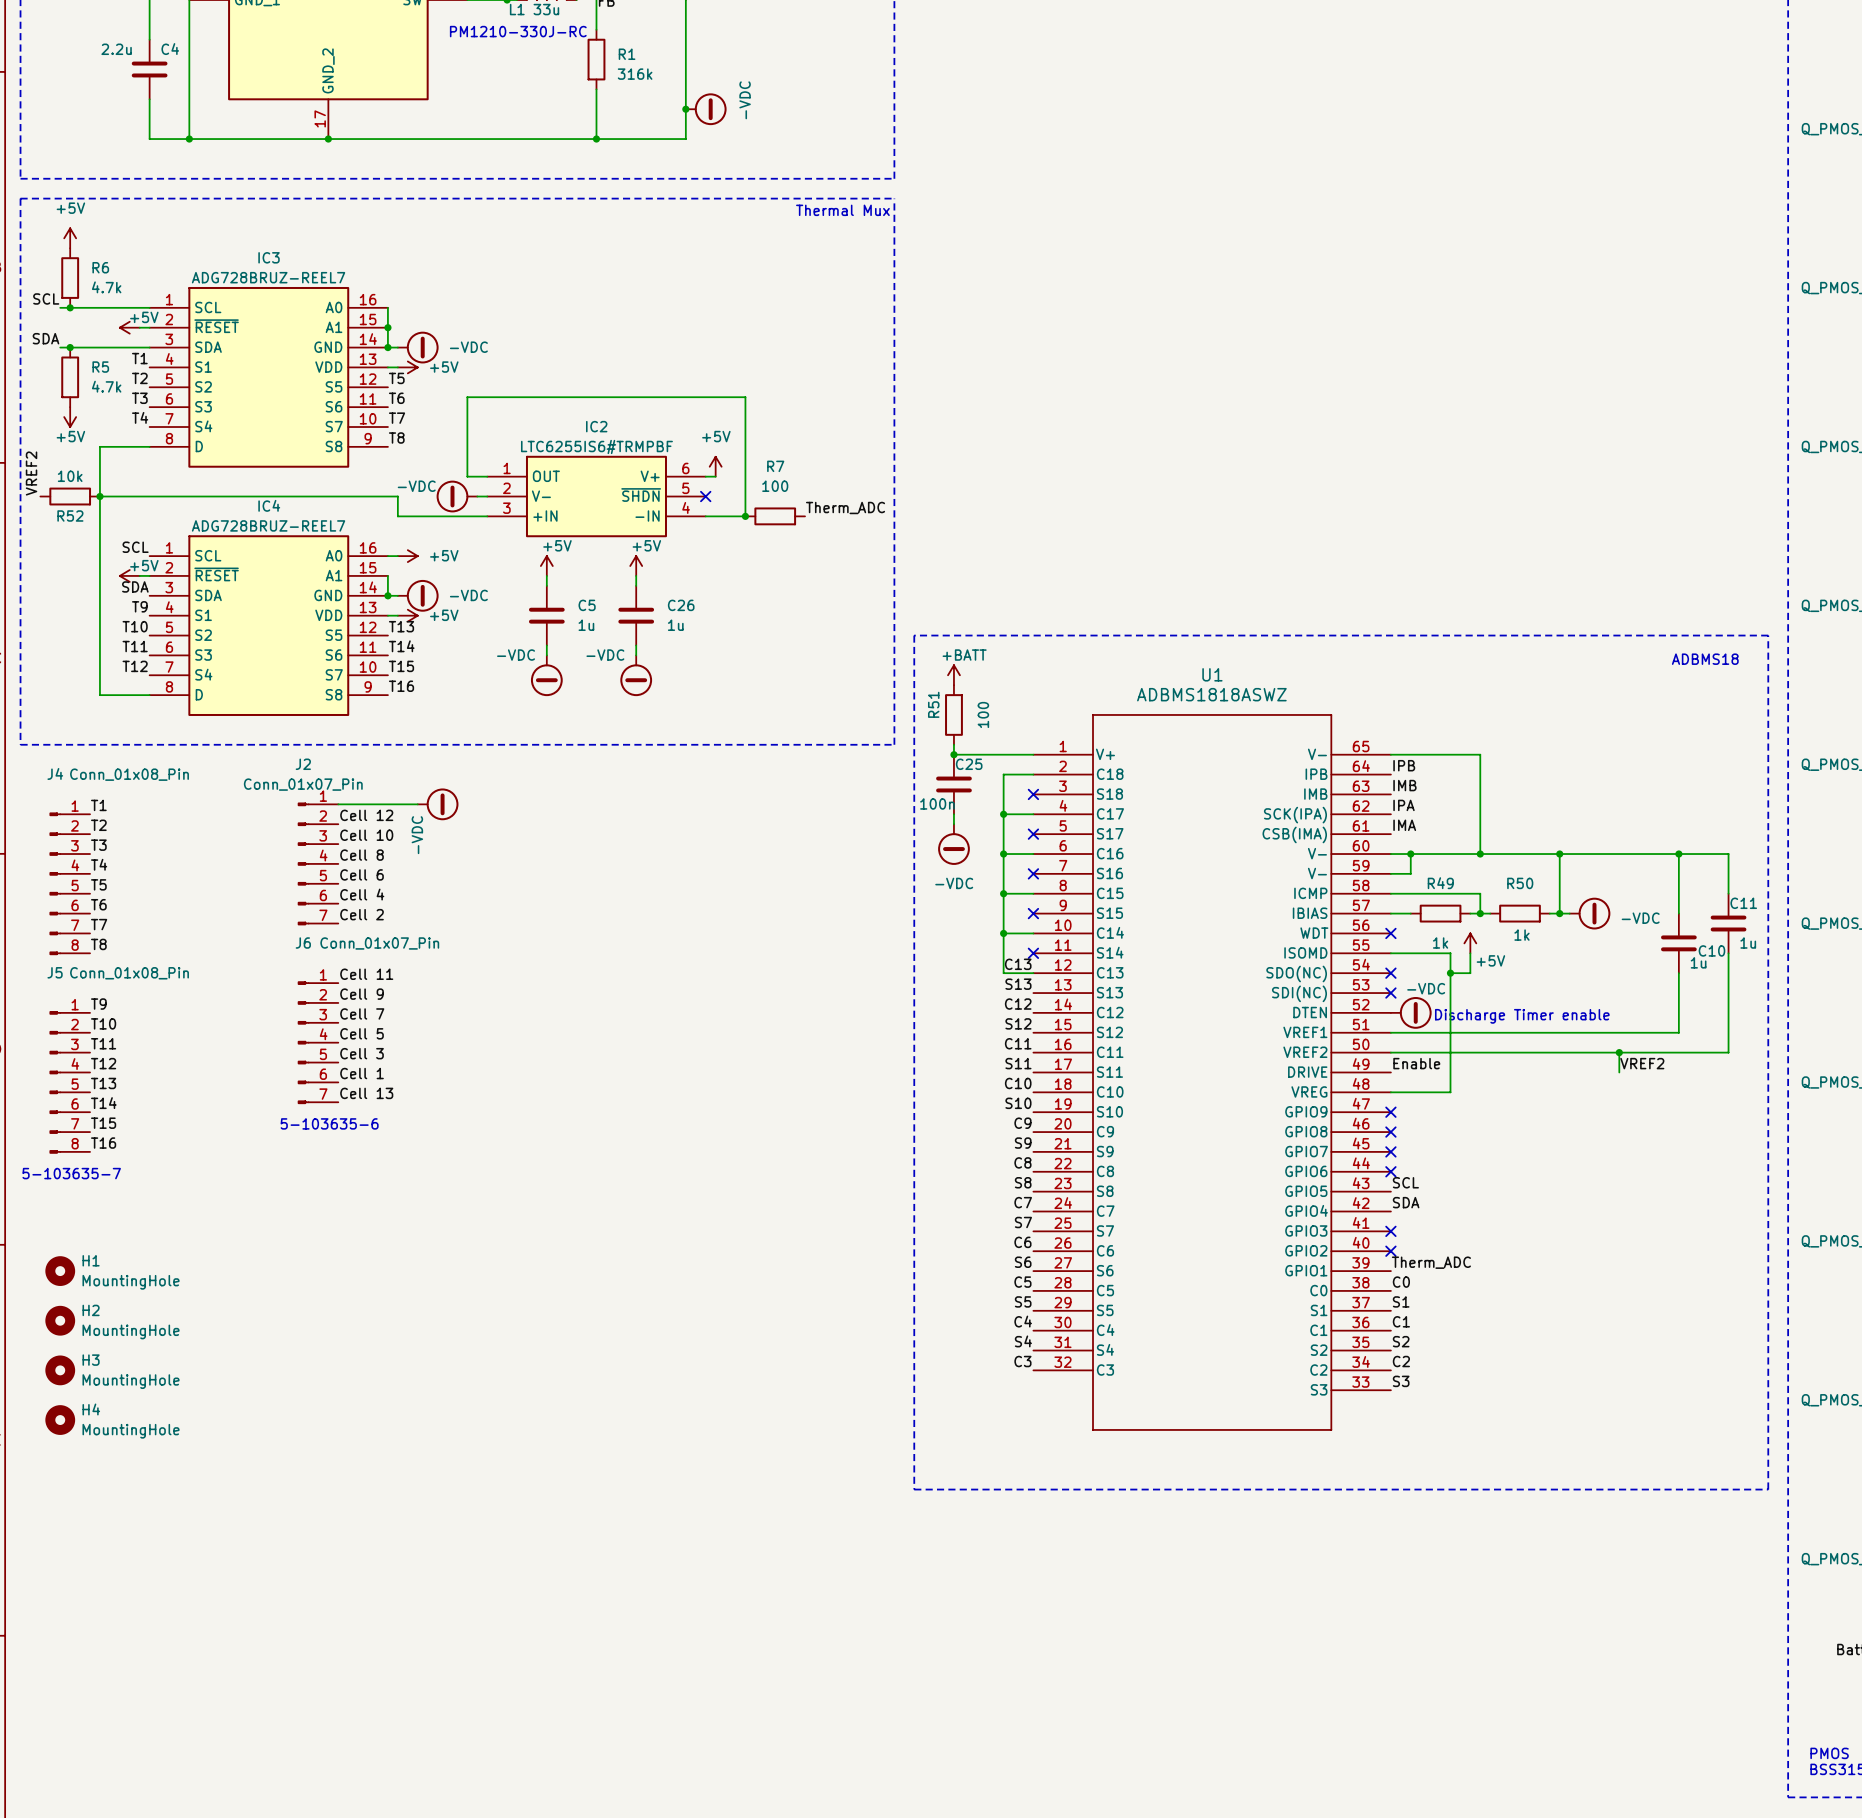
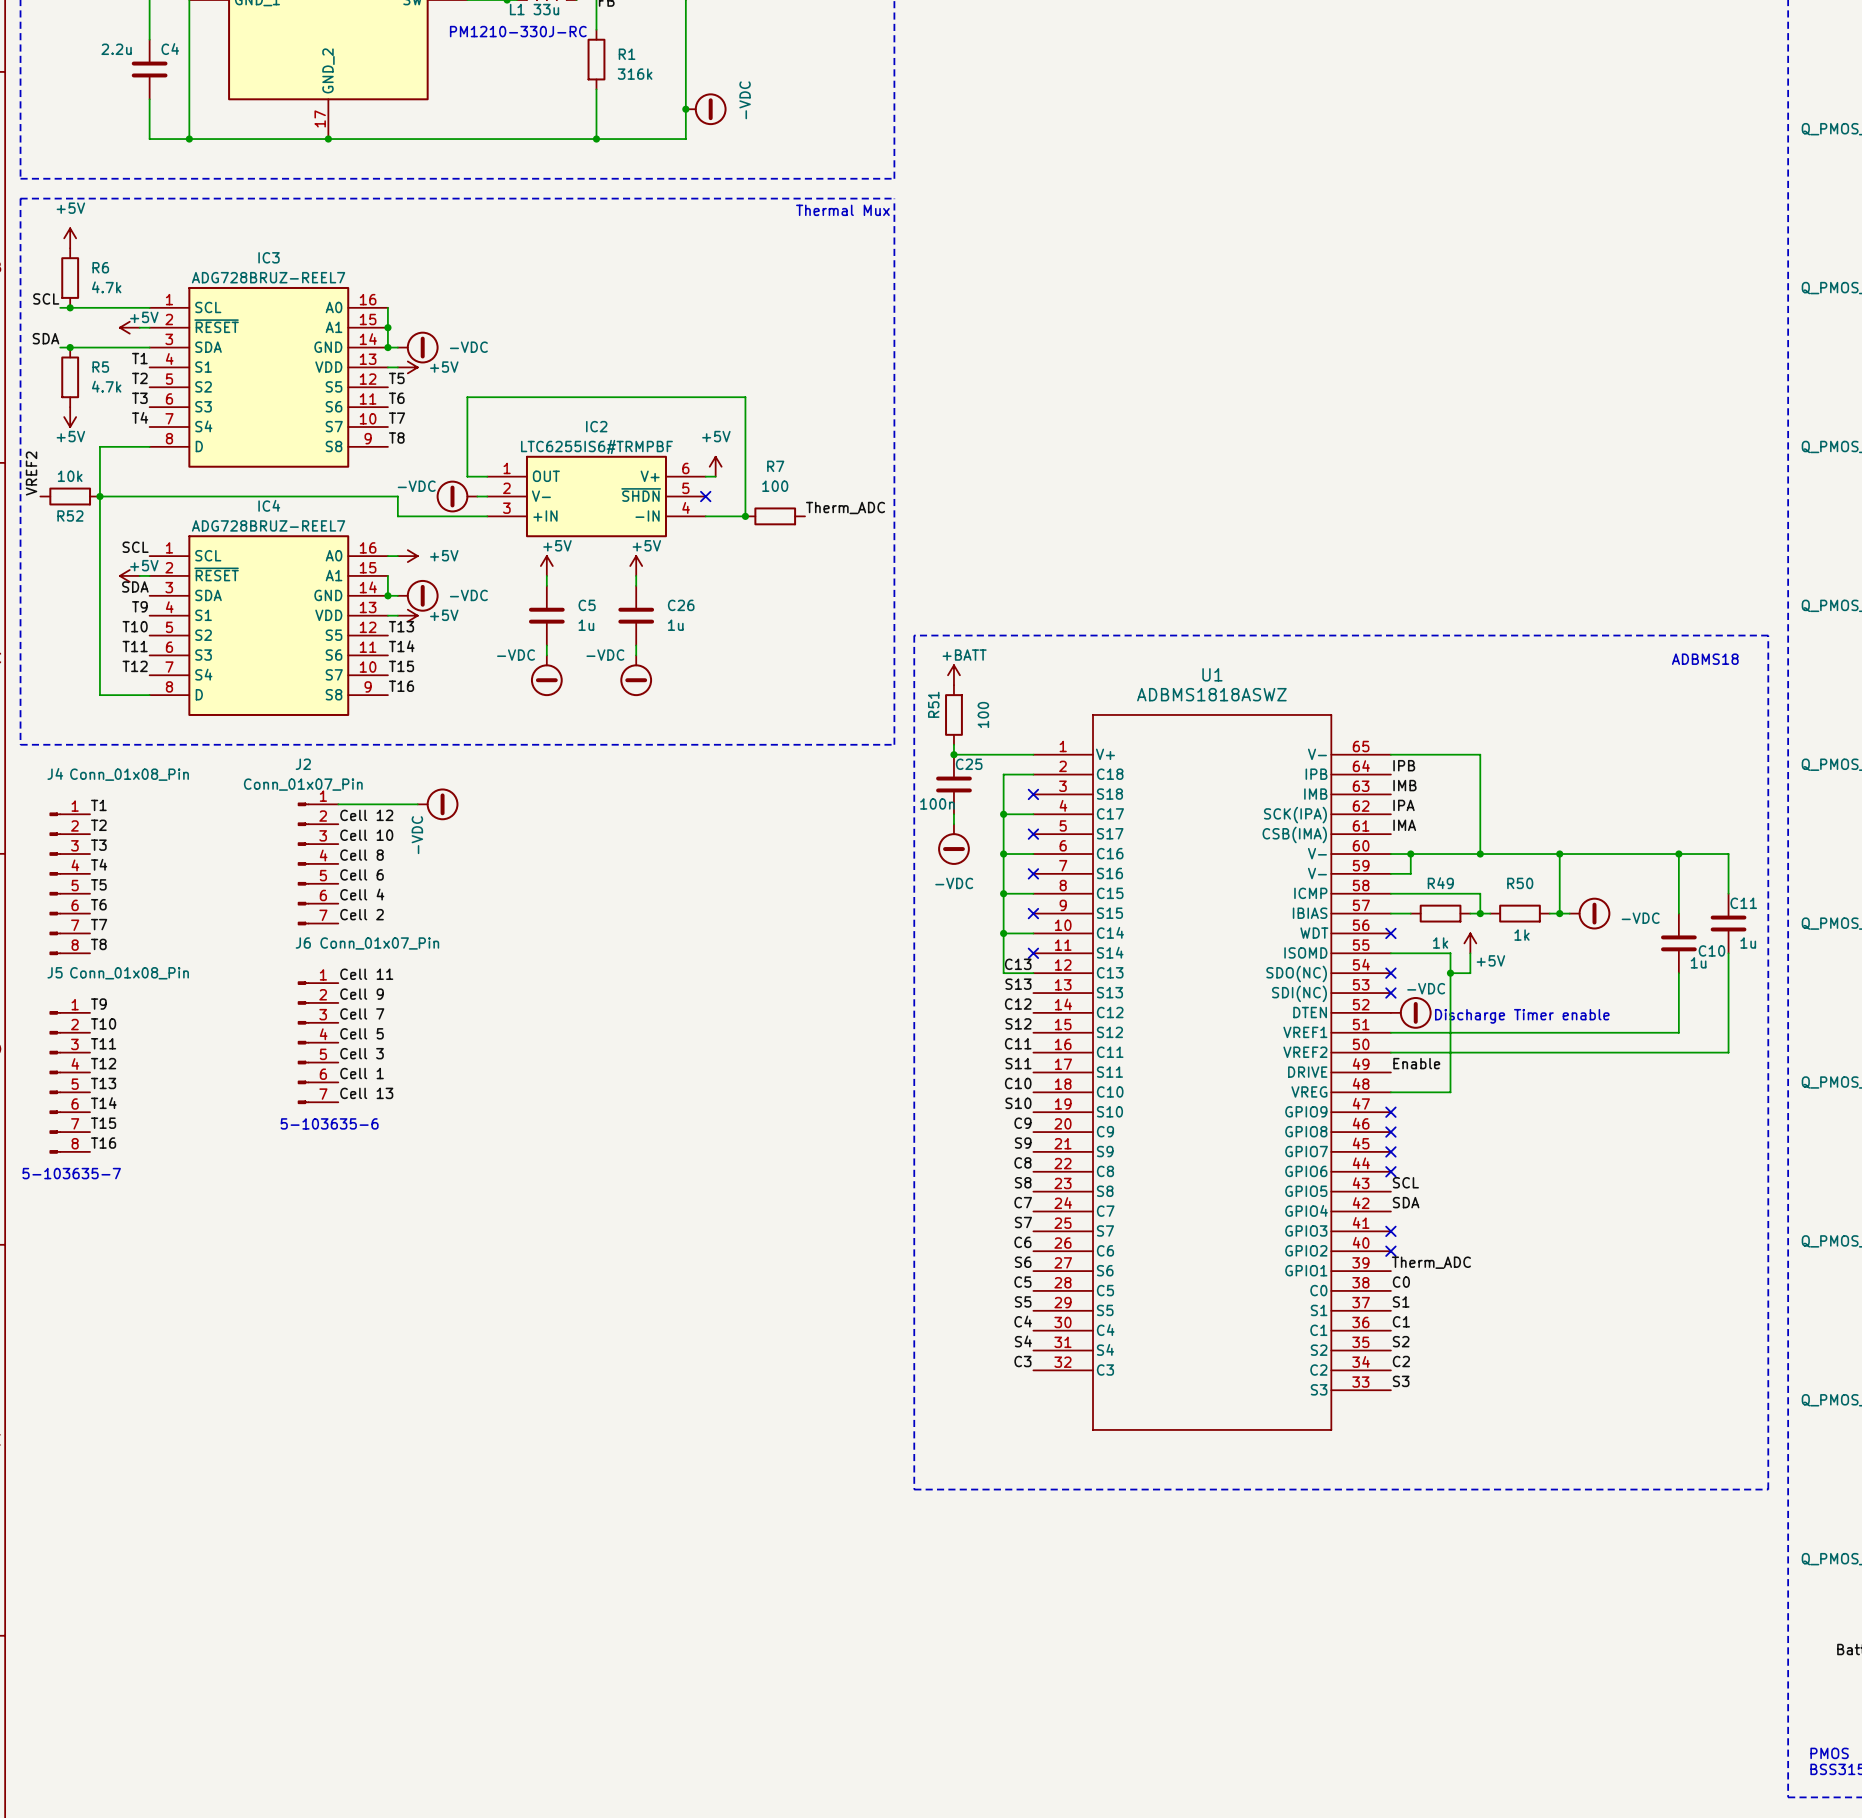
wire: (1619, 1052) (1619, 1072) -> none
junction: (1619, 1052) -> none
label: VREF2 (1642, 1063) -> none
H1: MountingHole (60, 1271) -> none
H2: MountingHole (60, 1320) -> none
H3: MountingHole (60, 1370) -> none
H4: MountingHole (60, 1420) -> none

